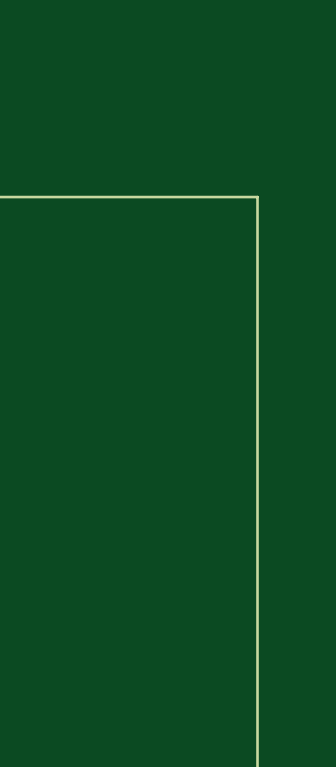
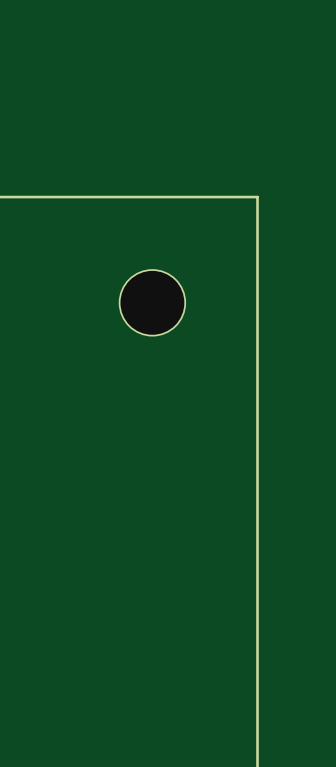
part: none -> (152, 302)

